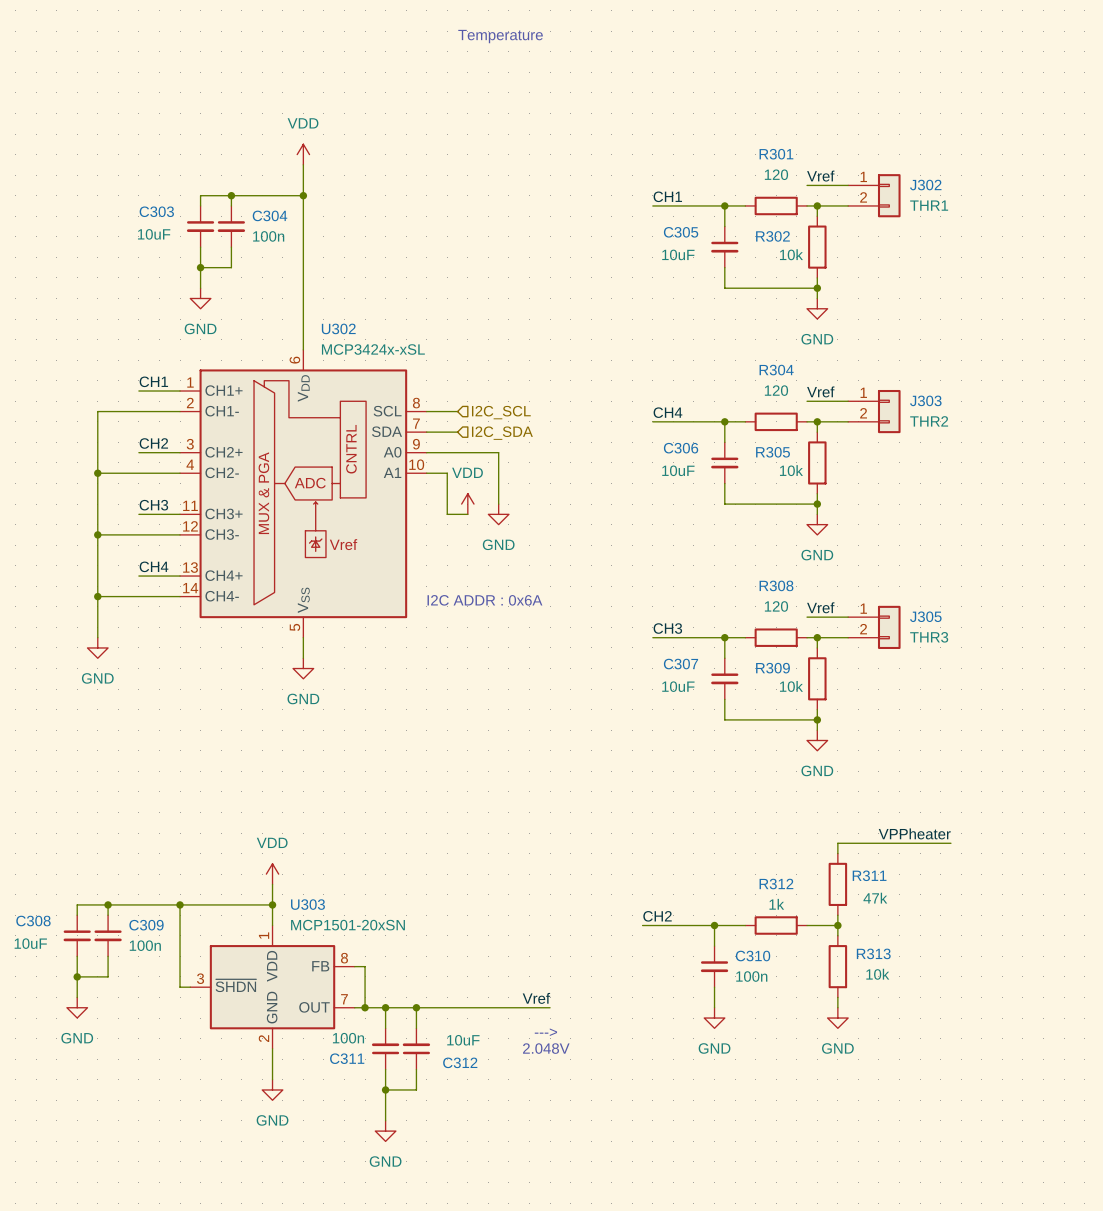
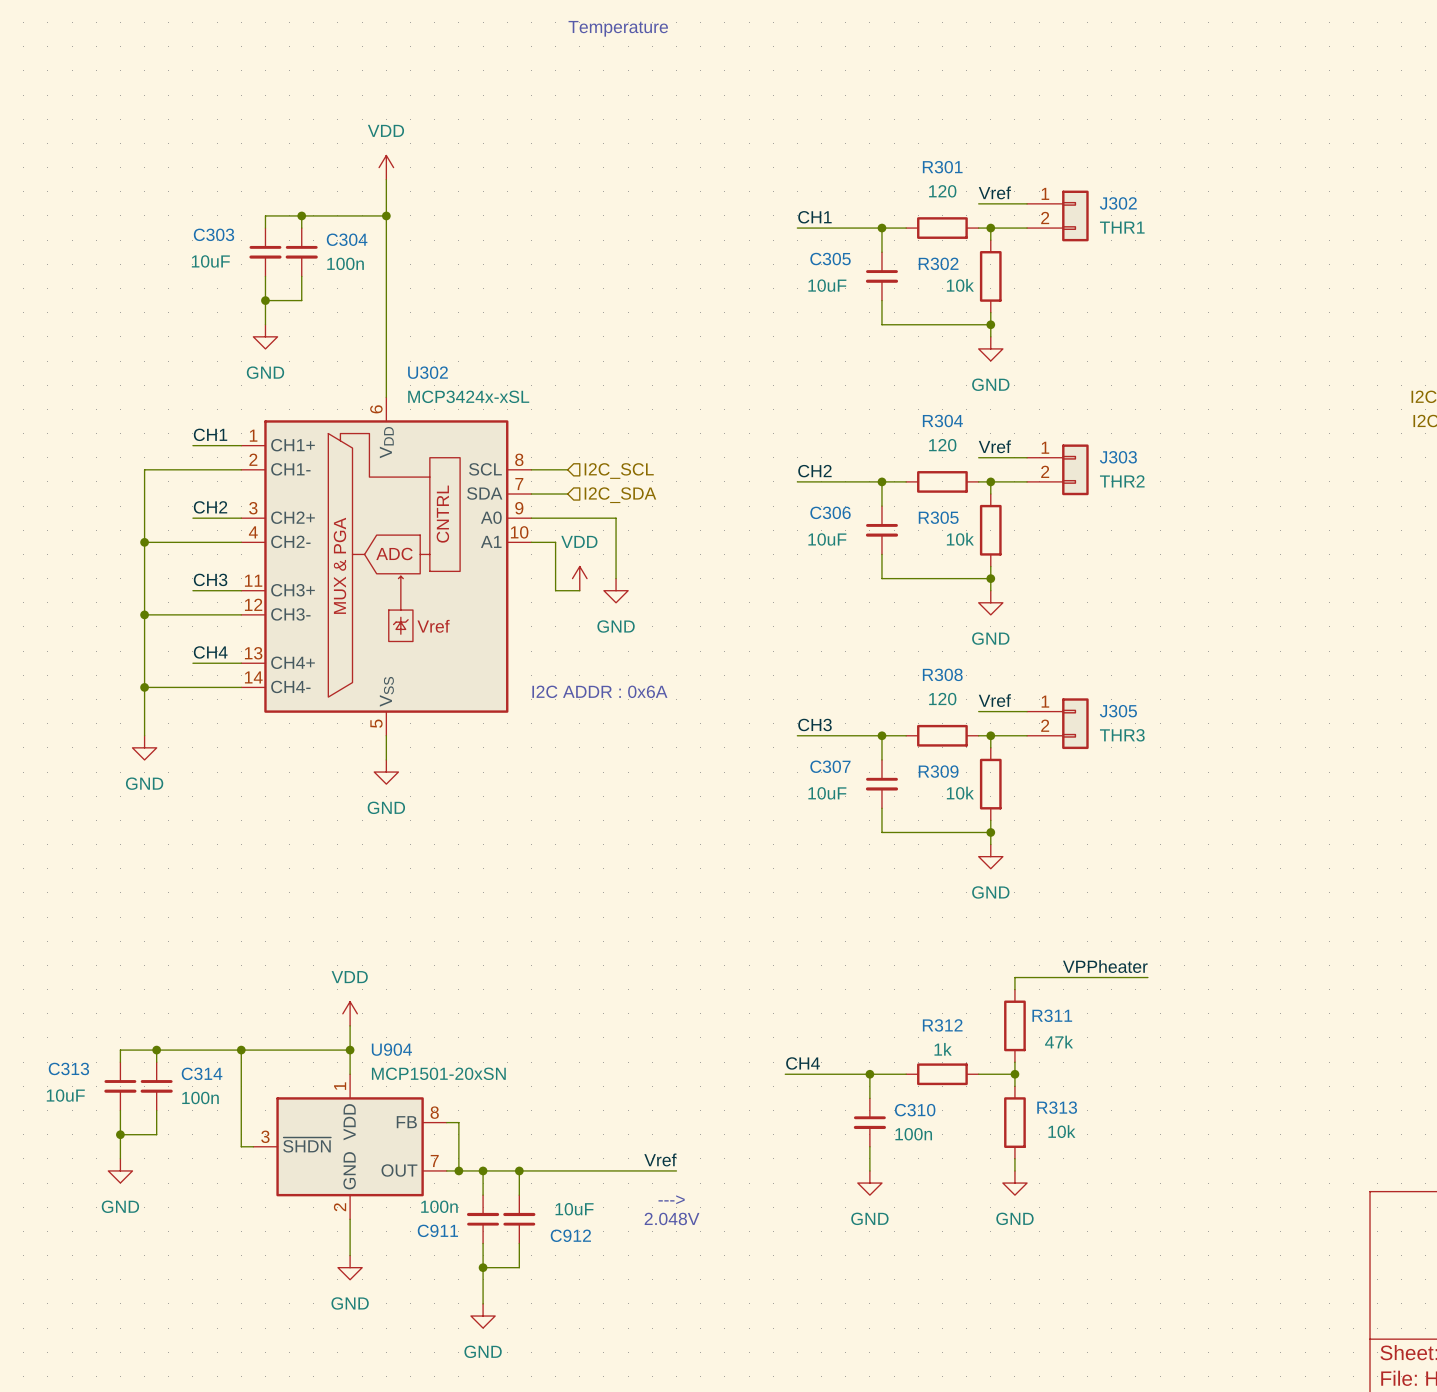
label: CH4 (667, 412) -> CH2 (814, 471)
U303 name: U303 (307, 904) -> U904 (391, 1049)
label: CH2 (657, 916) -> CH4 (803, 1063)
C308 name: C308 (33, 921) -> C313 (68, 1068)
C309 name: C309 (146, 925) -> C314 (202, 1073)
C311 name: C311 (347, 1058) -> C911 (437, 1230)
C312 name: C312 (460, 1062) -> C912 (570, 1235)

